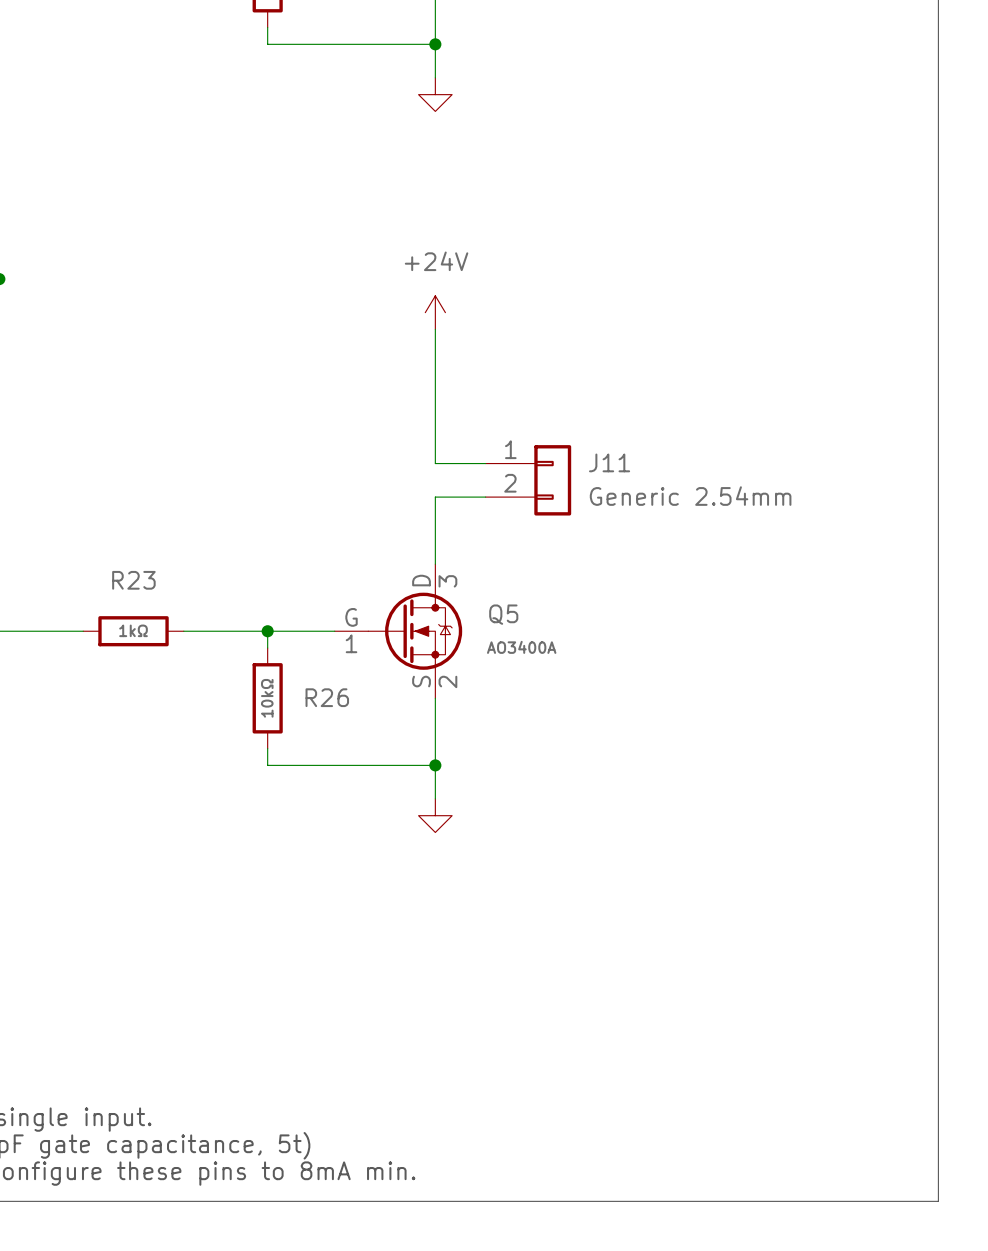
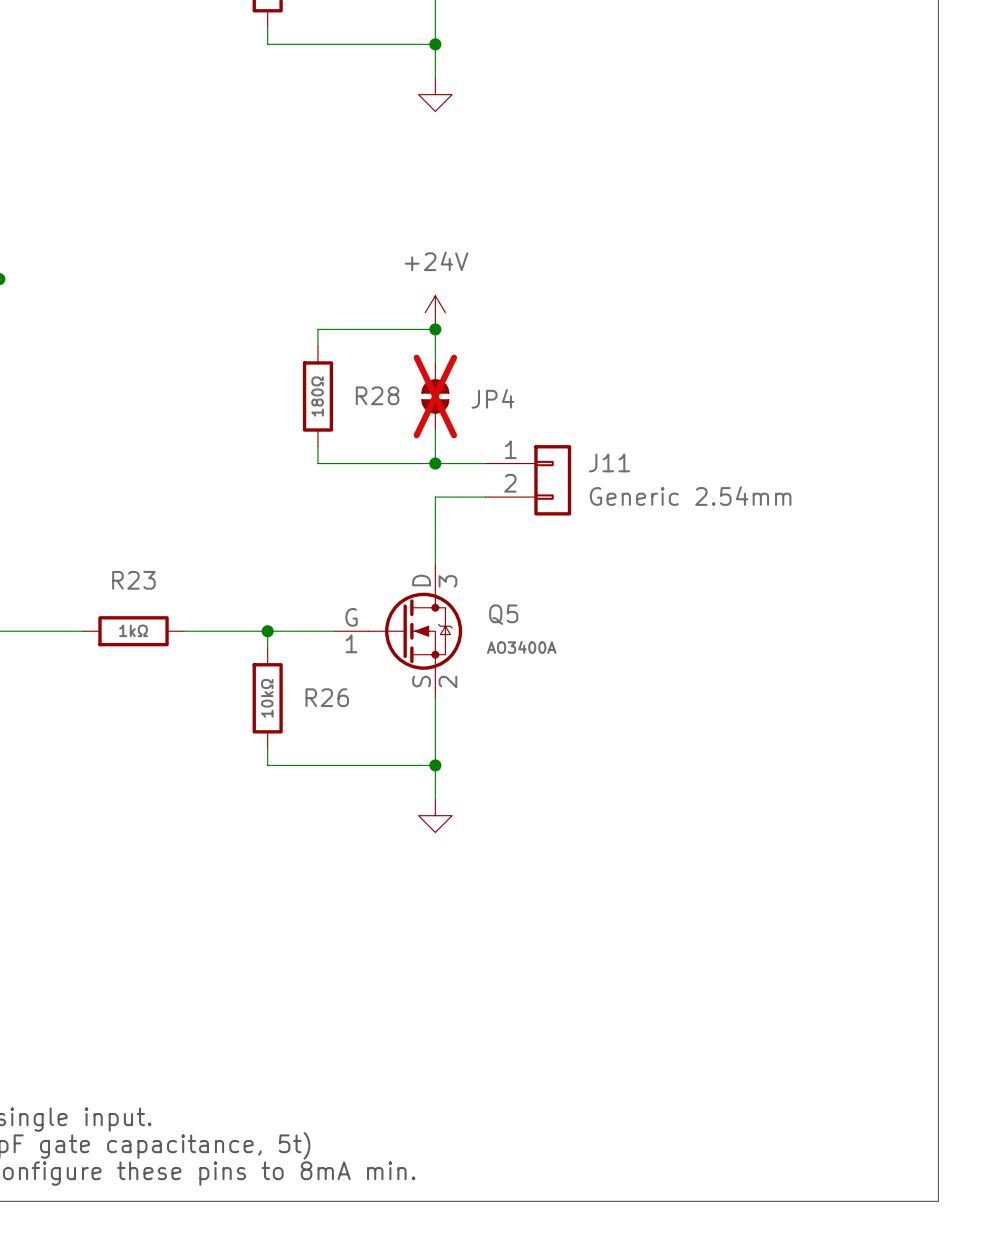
wire: none -> (435, 329) (317, 329) (317, 346)
junction: none -> (435, 329)
R28: none -> 180Ω (317, 396)
JP4: none -> (435, 396)
wire: none -> (317, 446) (317, 463) (435, 463)
junction: none -> (435, 463)

